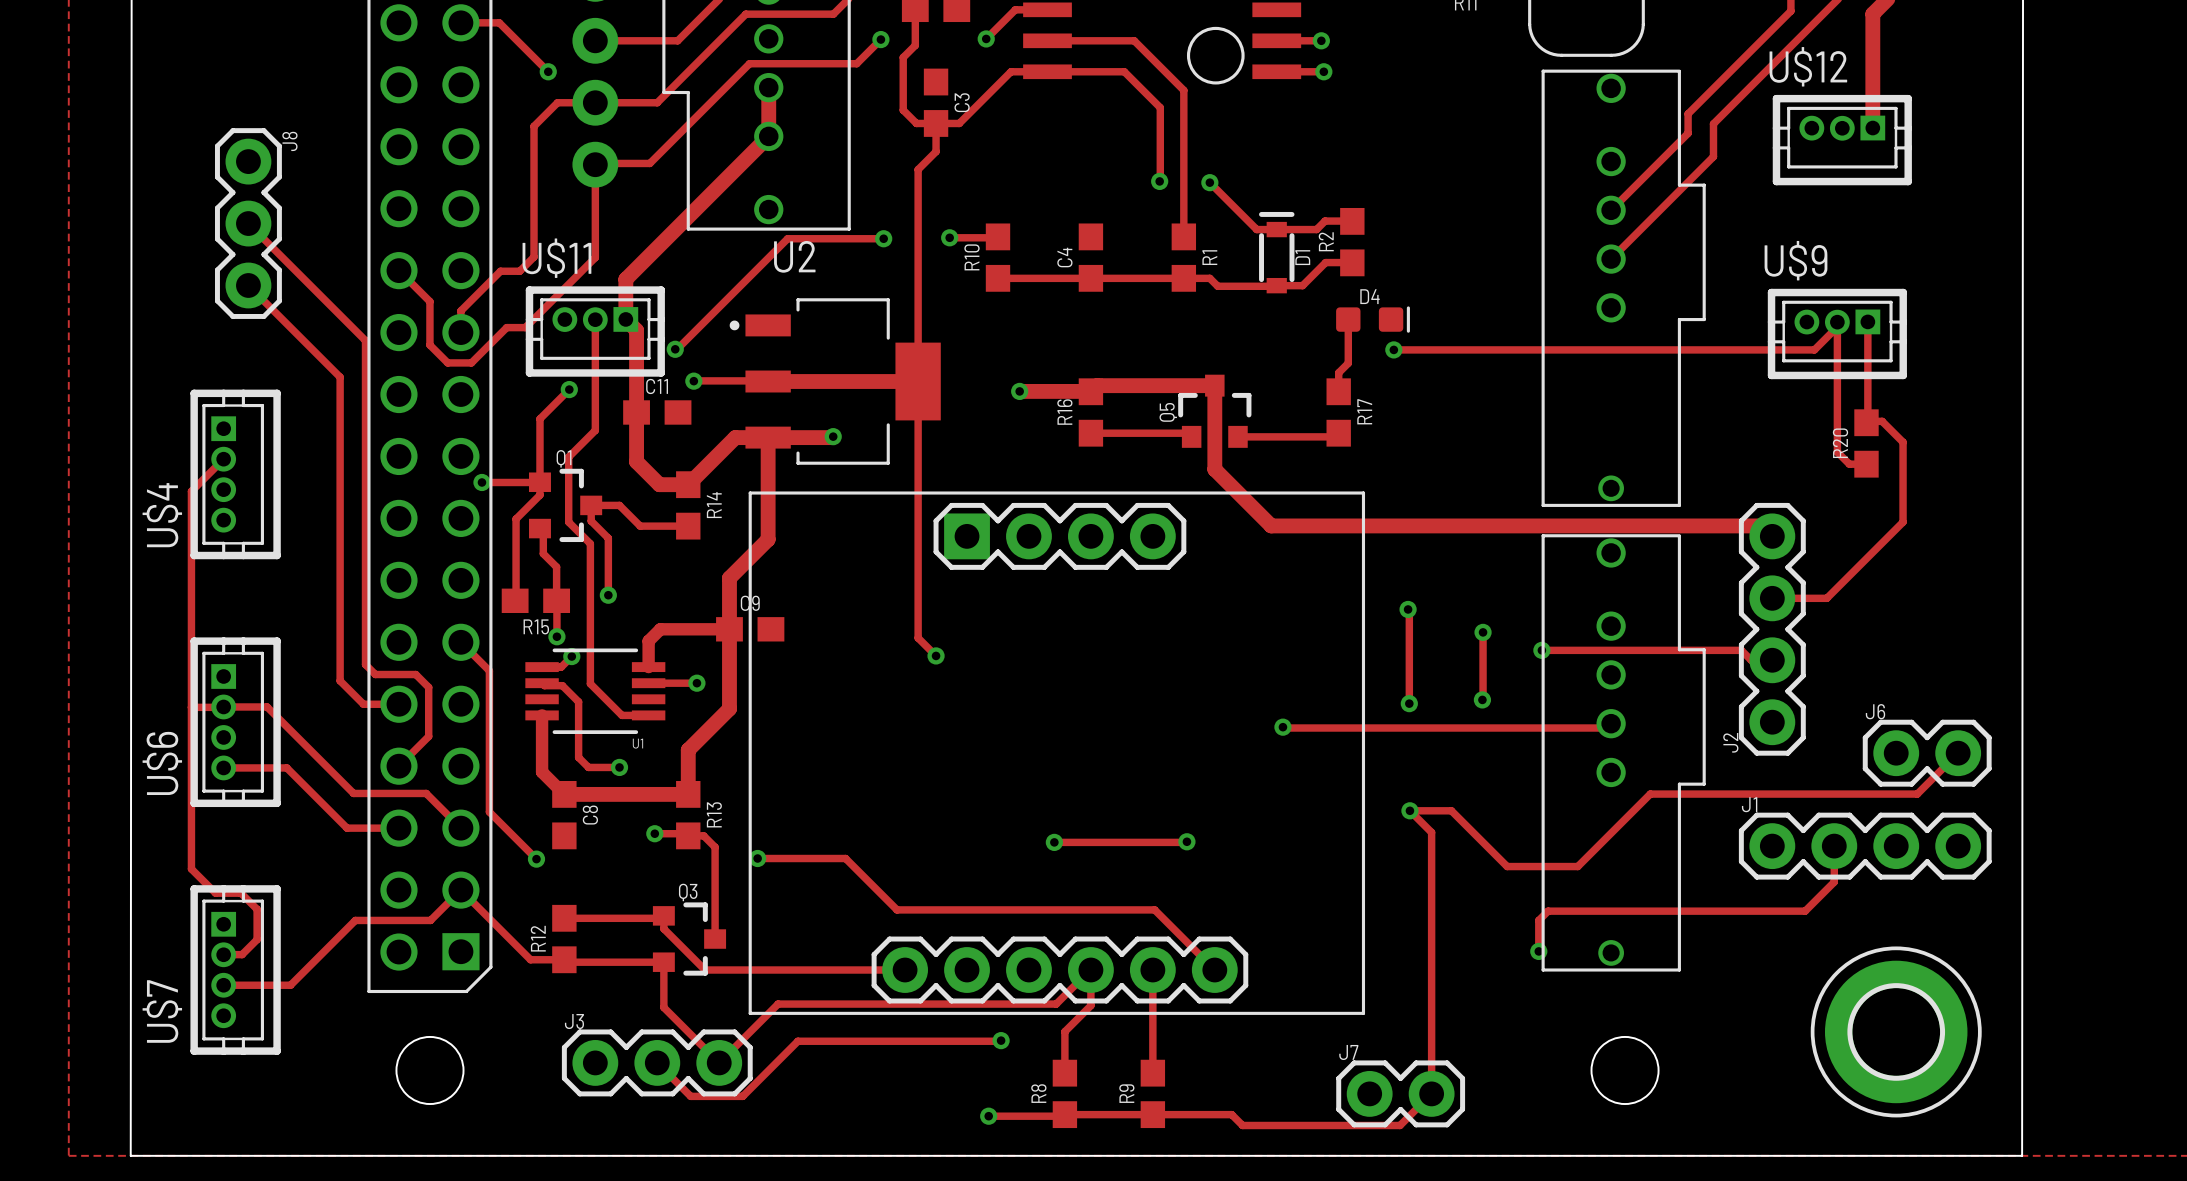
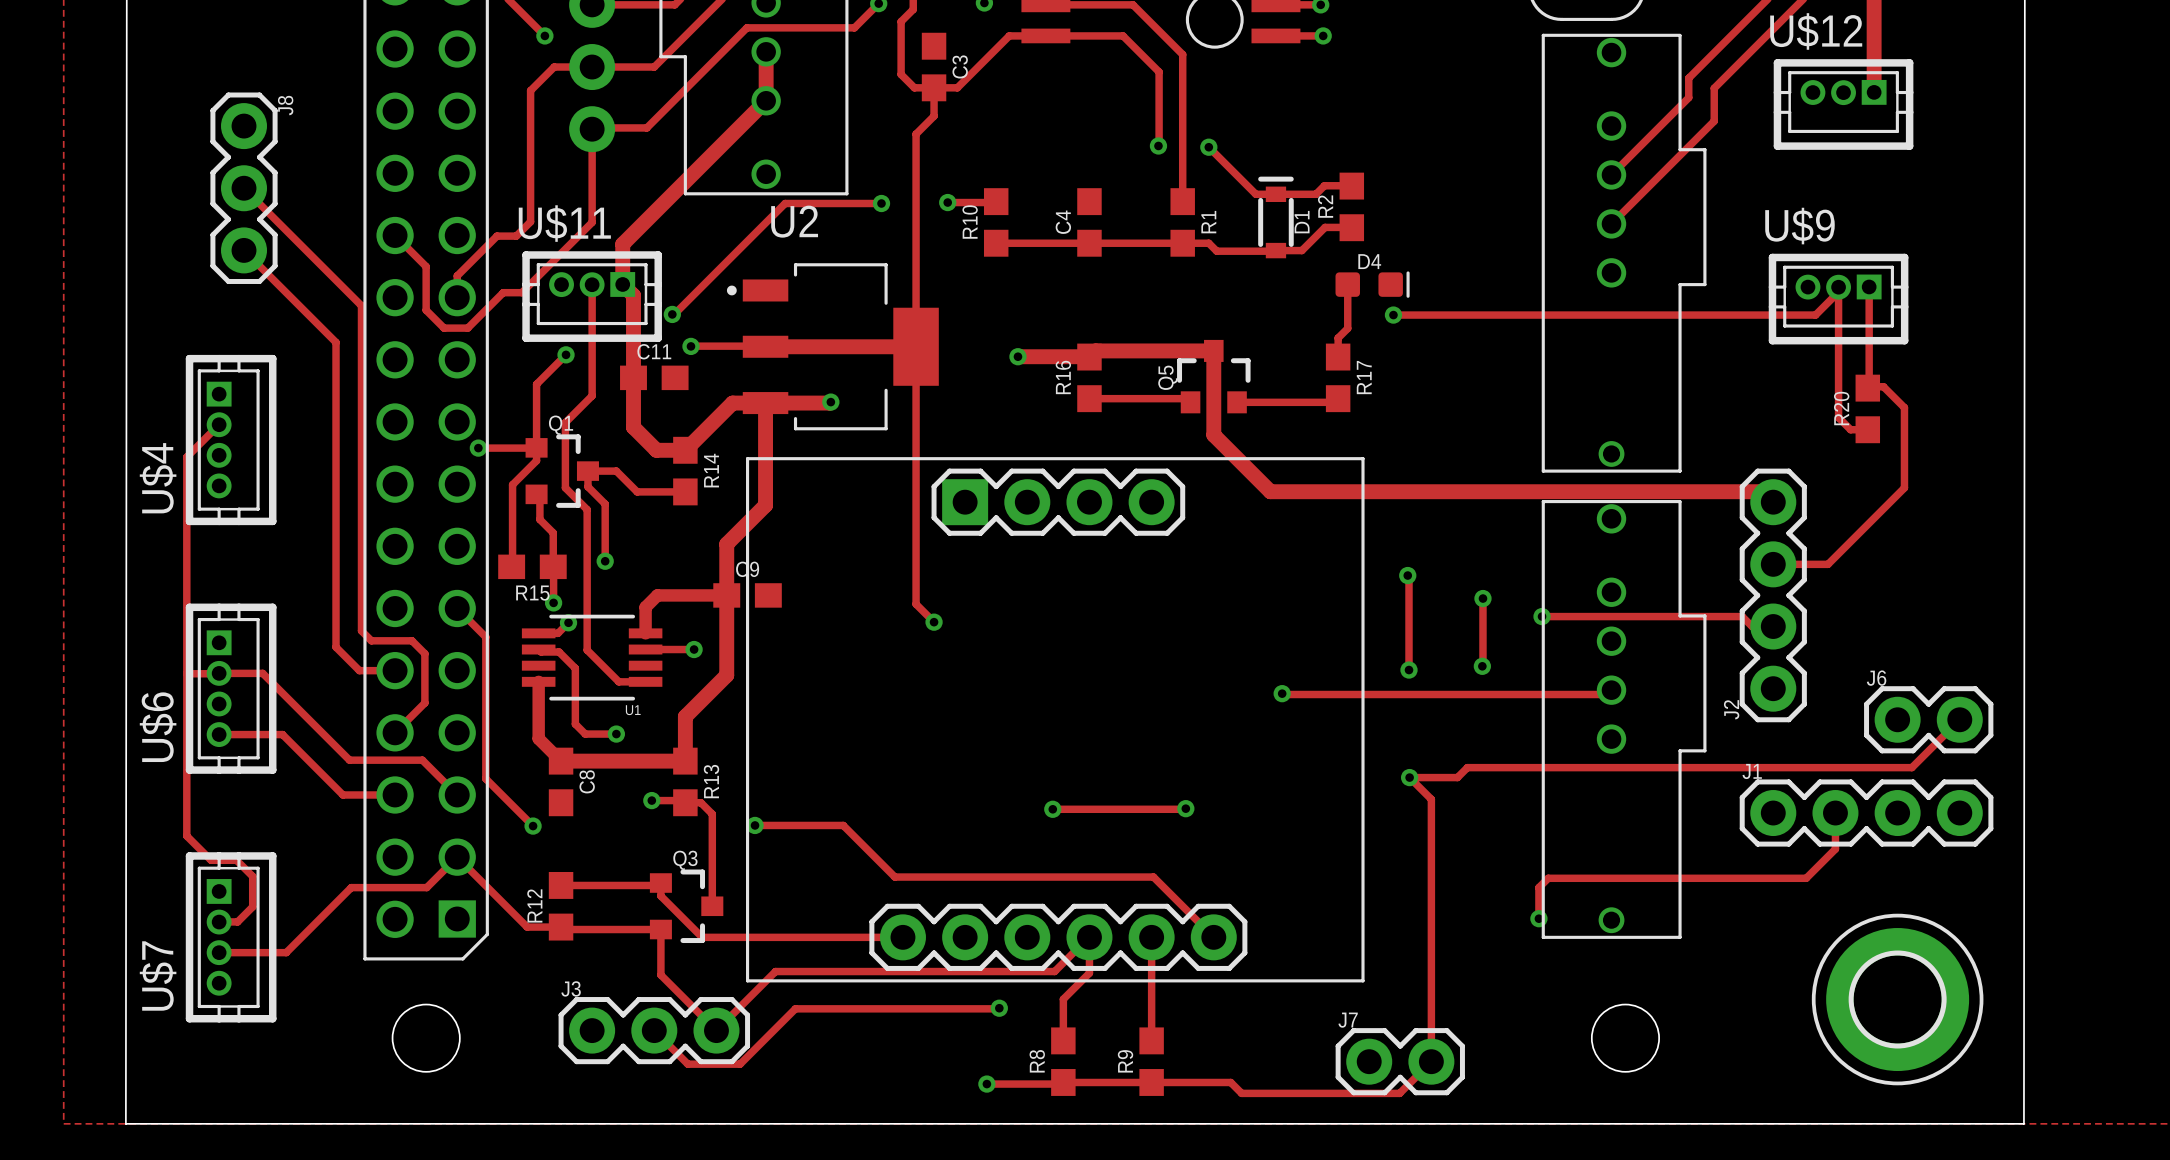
track: (1917, 794) (1650, 794) (1577, 866) (1507, 866) (1451, 810) -> (1918, 760) (1911, 767) (1467, 767) (1457, 777) (1451, 777)

